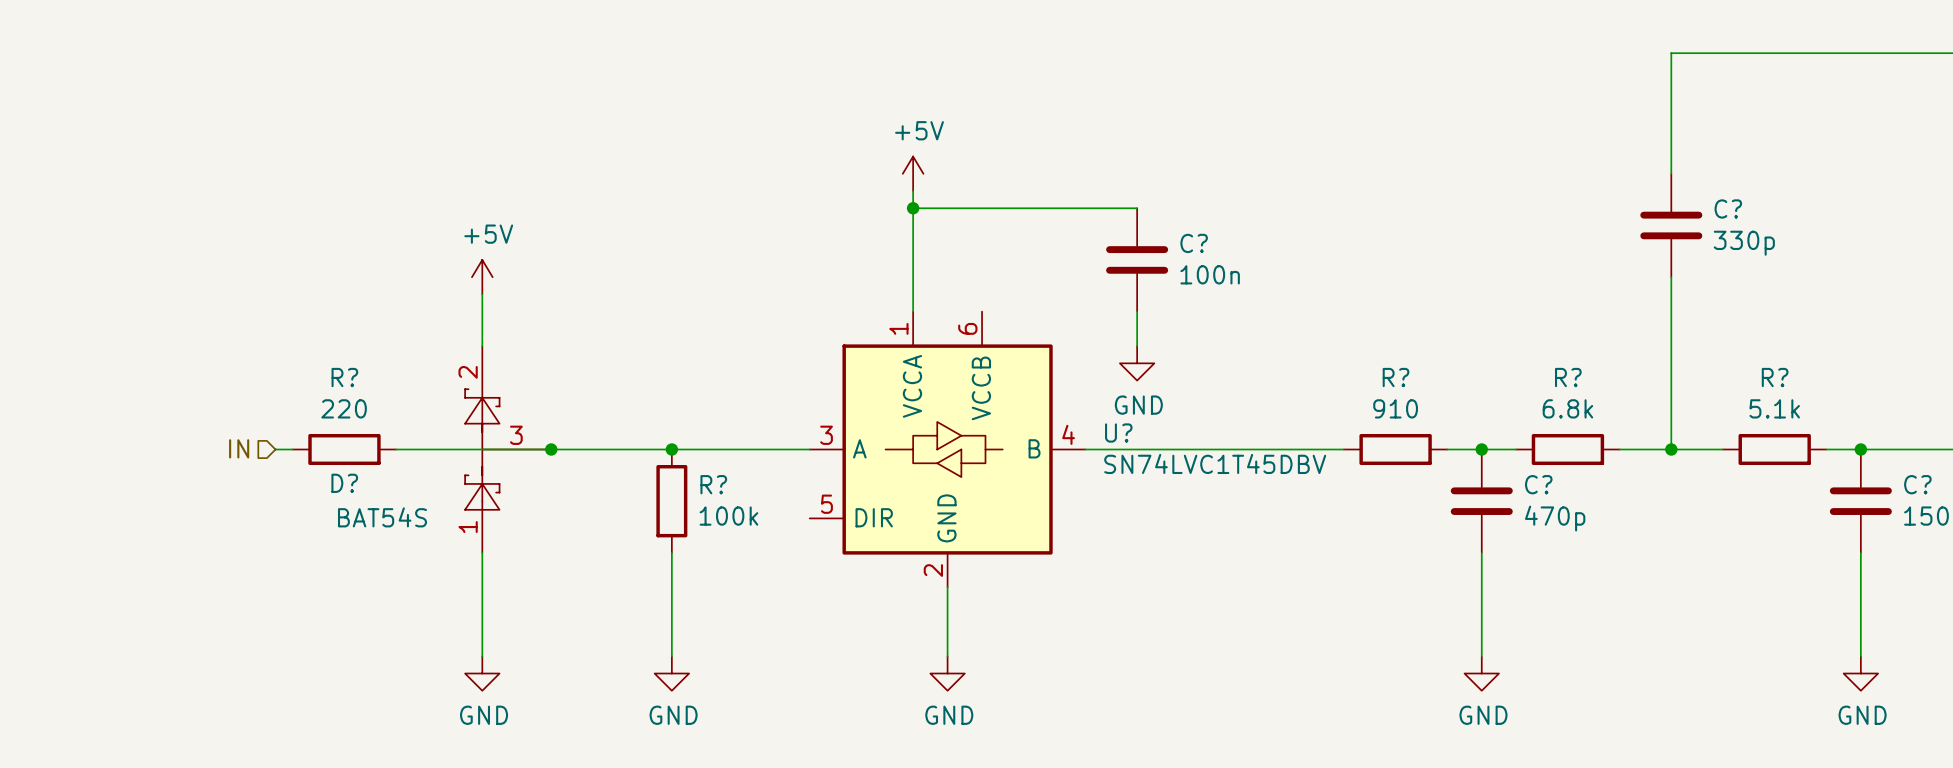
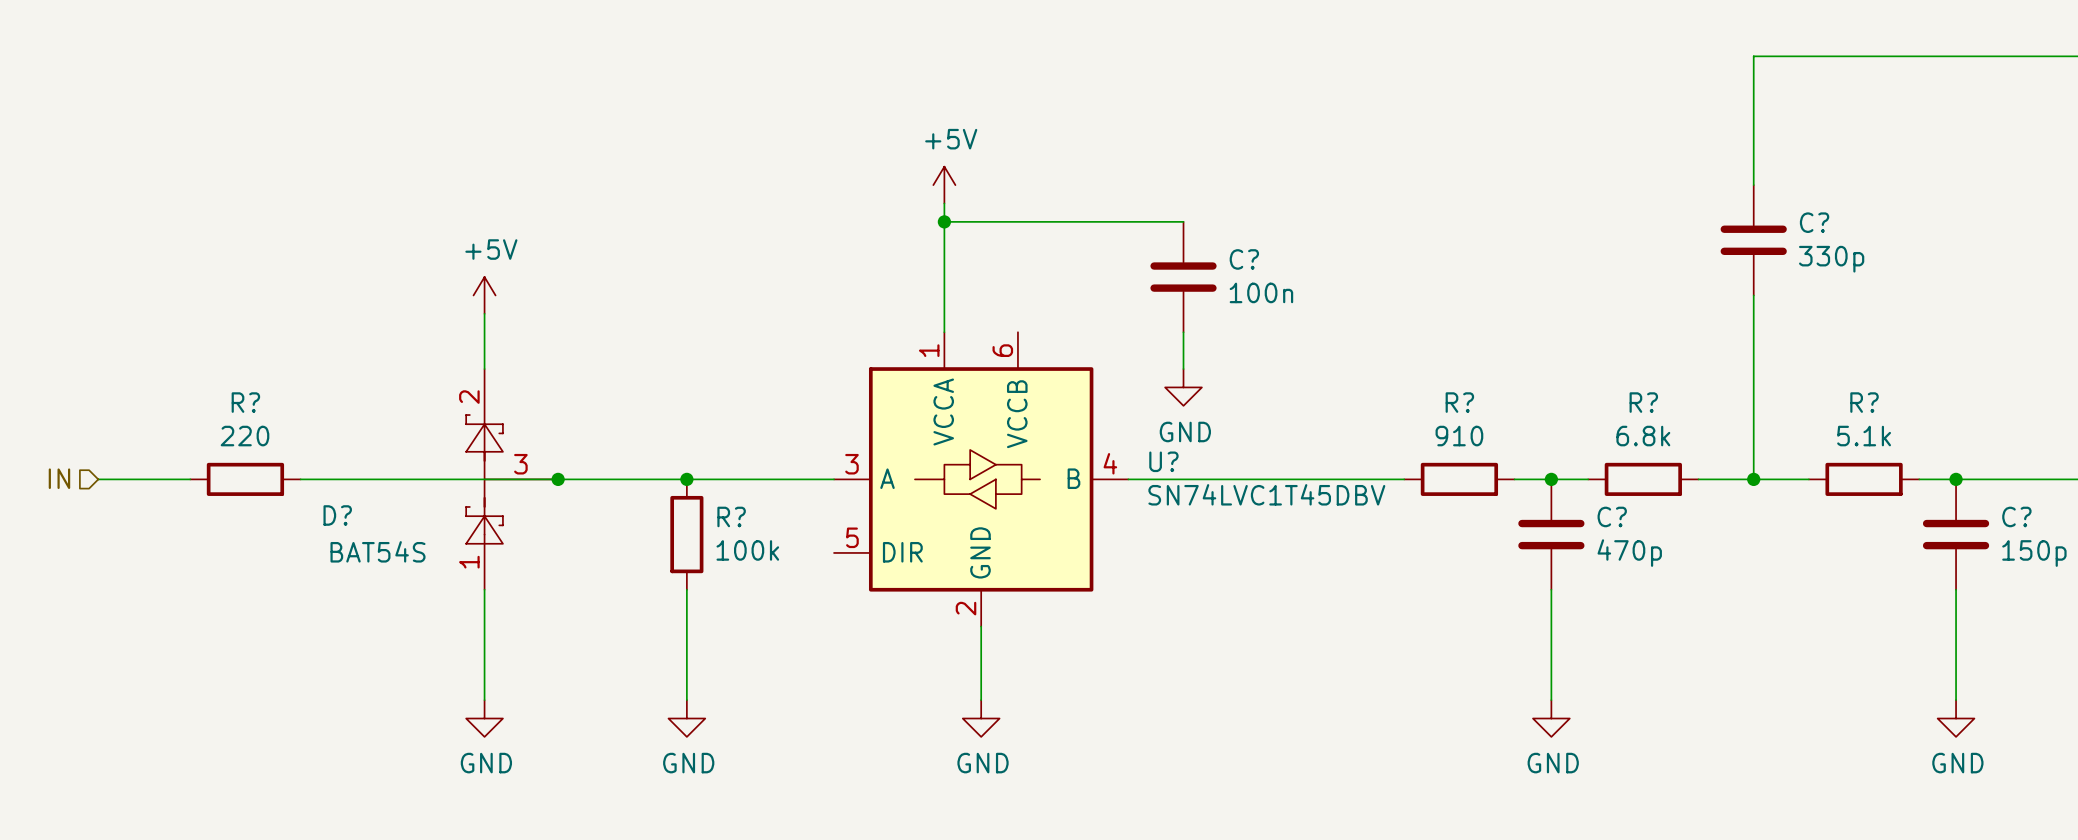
hierarchical label position: IN (239, 448) -> IN (59, 478)
wire: none -> (98, 479) (190, 479)
wire: (275, 449) (292, 449) -> none
wire: none -> (300, 479) (392, 479)
R? position: (344, 449) -> (245, 479)

